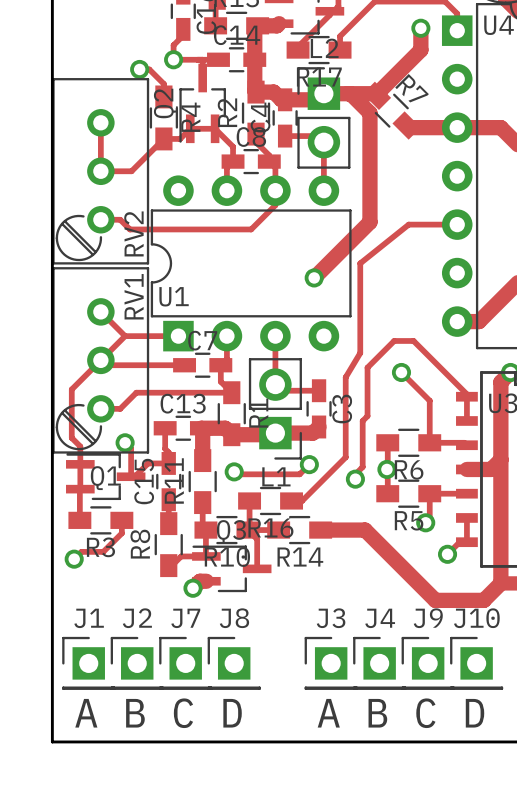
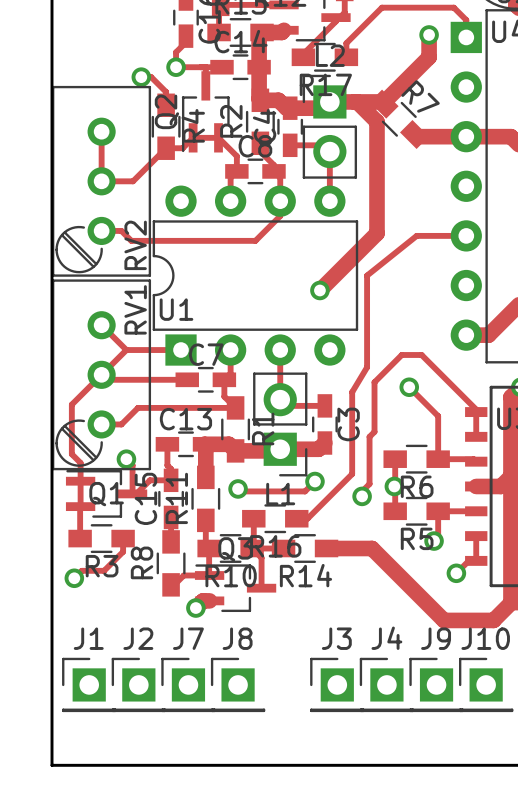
text: A (86, 713) -> none
text: B (135, 713) -> none
text: C (183, 713) -> none
text: D (232, 713) -> none
text: A (328, 713) -> none
text: B (377, 713) -> none
text: C (425, 713) -> none
text: D (475, 713) -> none

